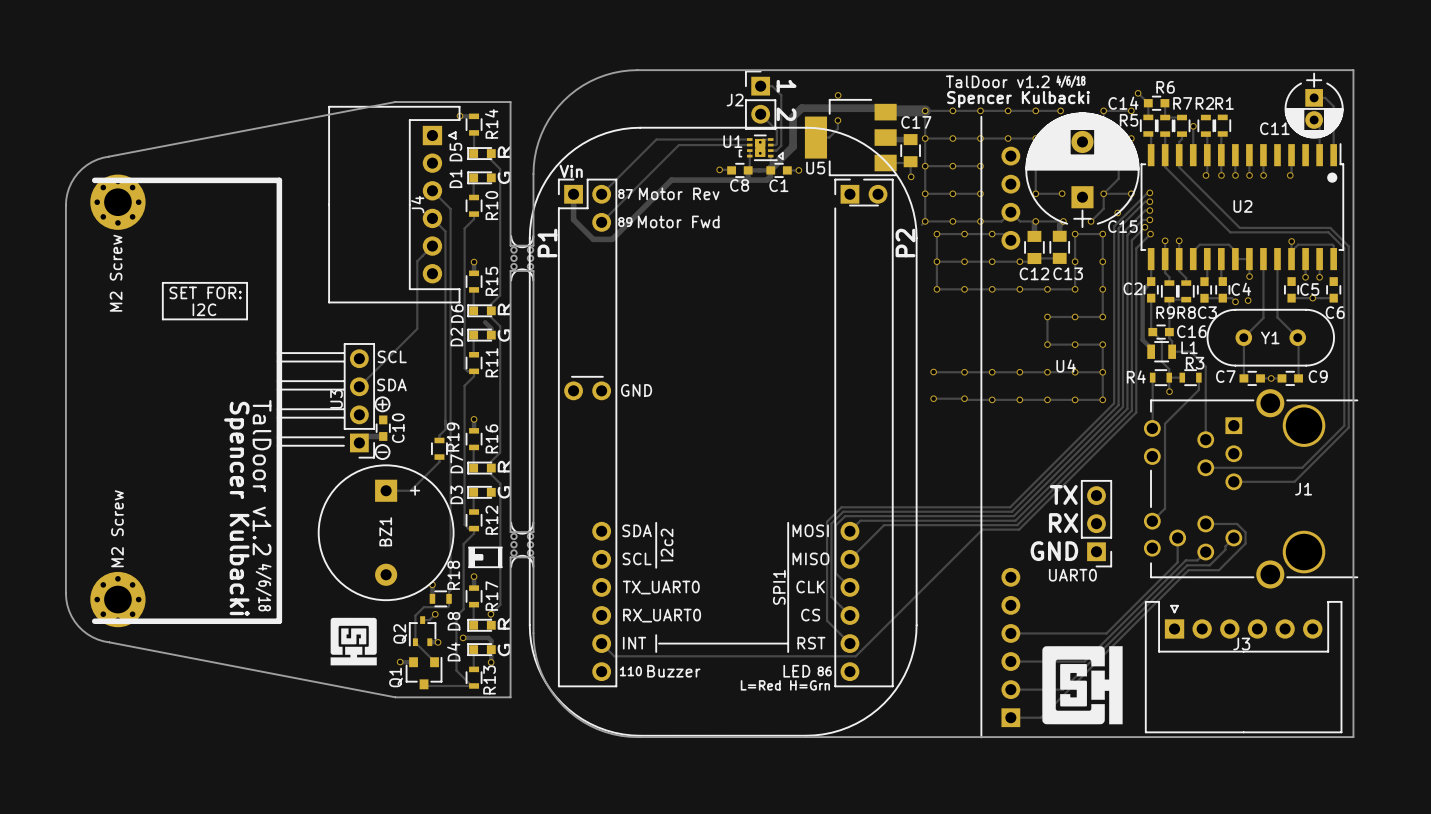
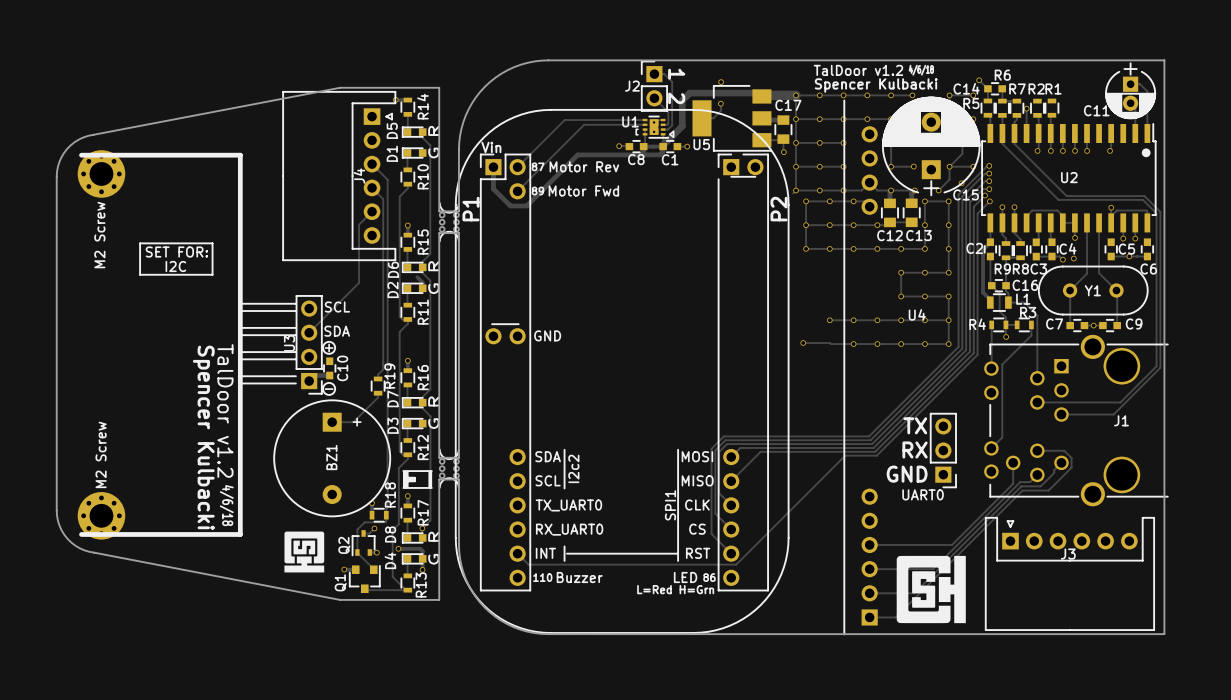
track: (933, 372) (964, 372) -> none
via: (933, 372) -> none
via: (964, 398) -> none

